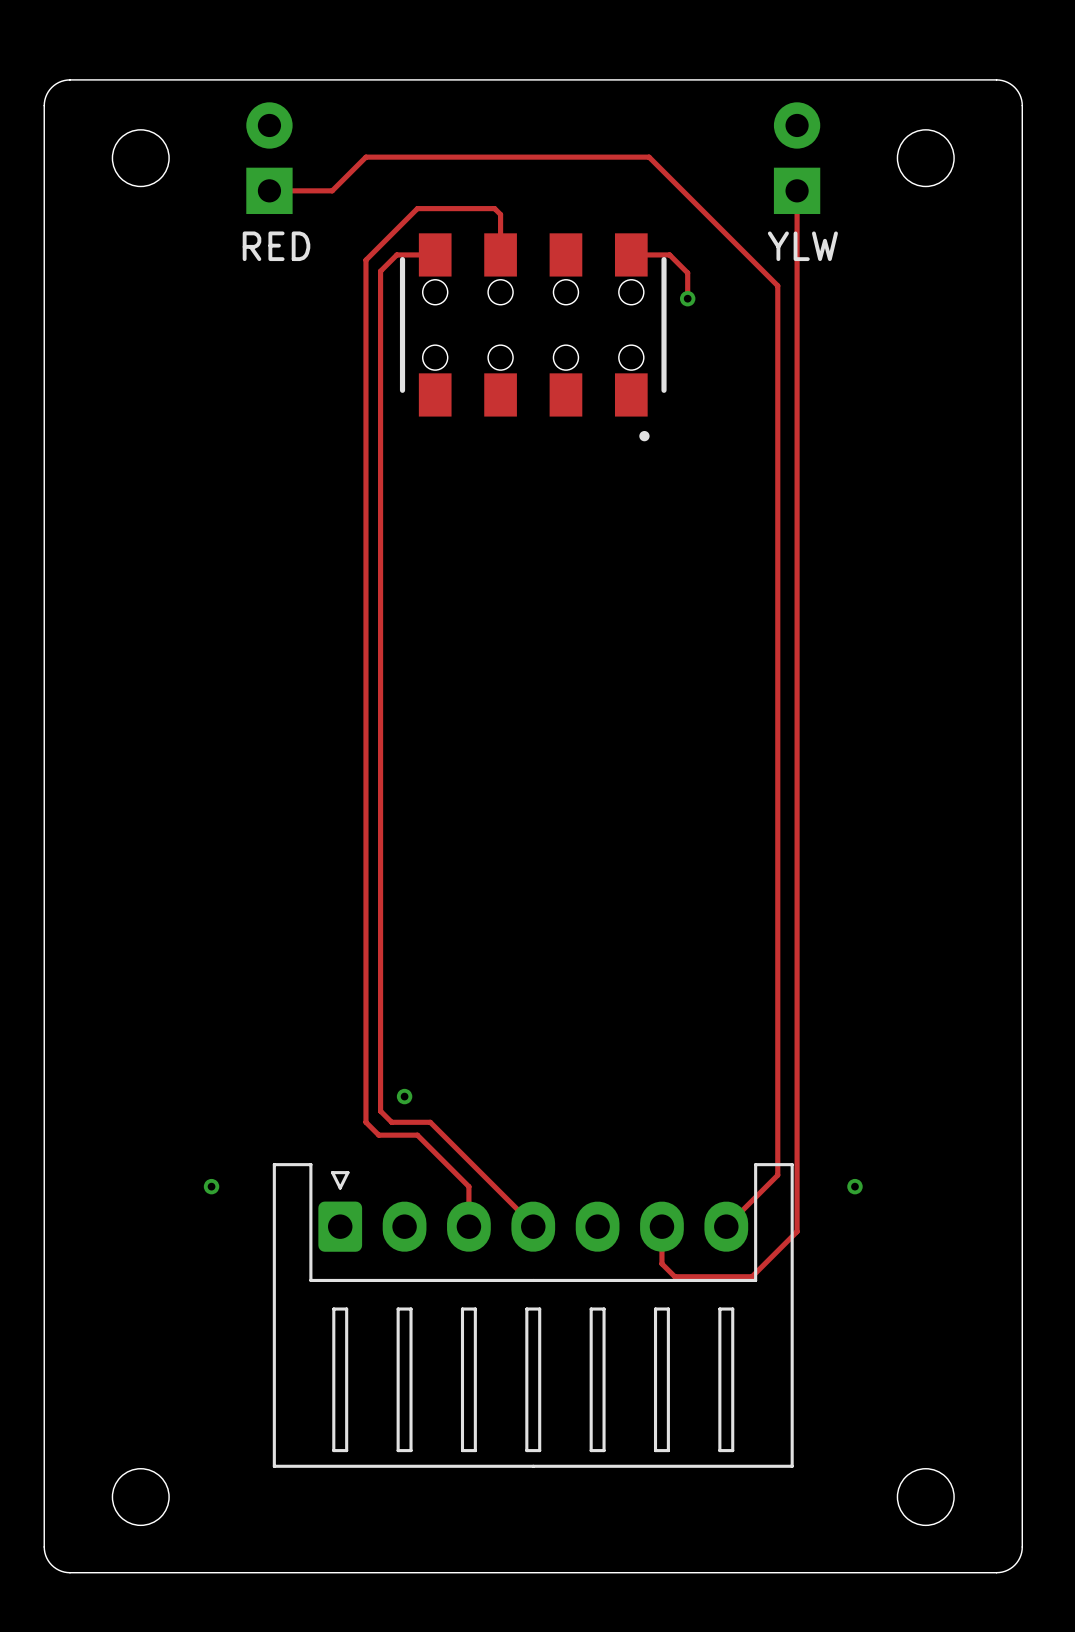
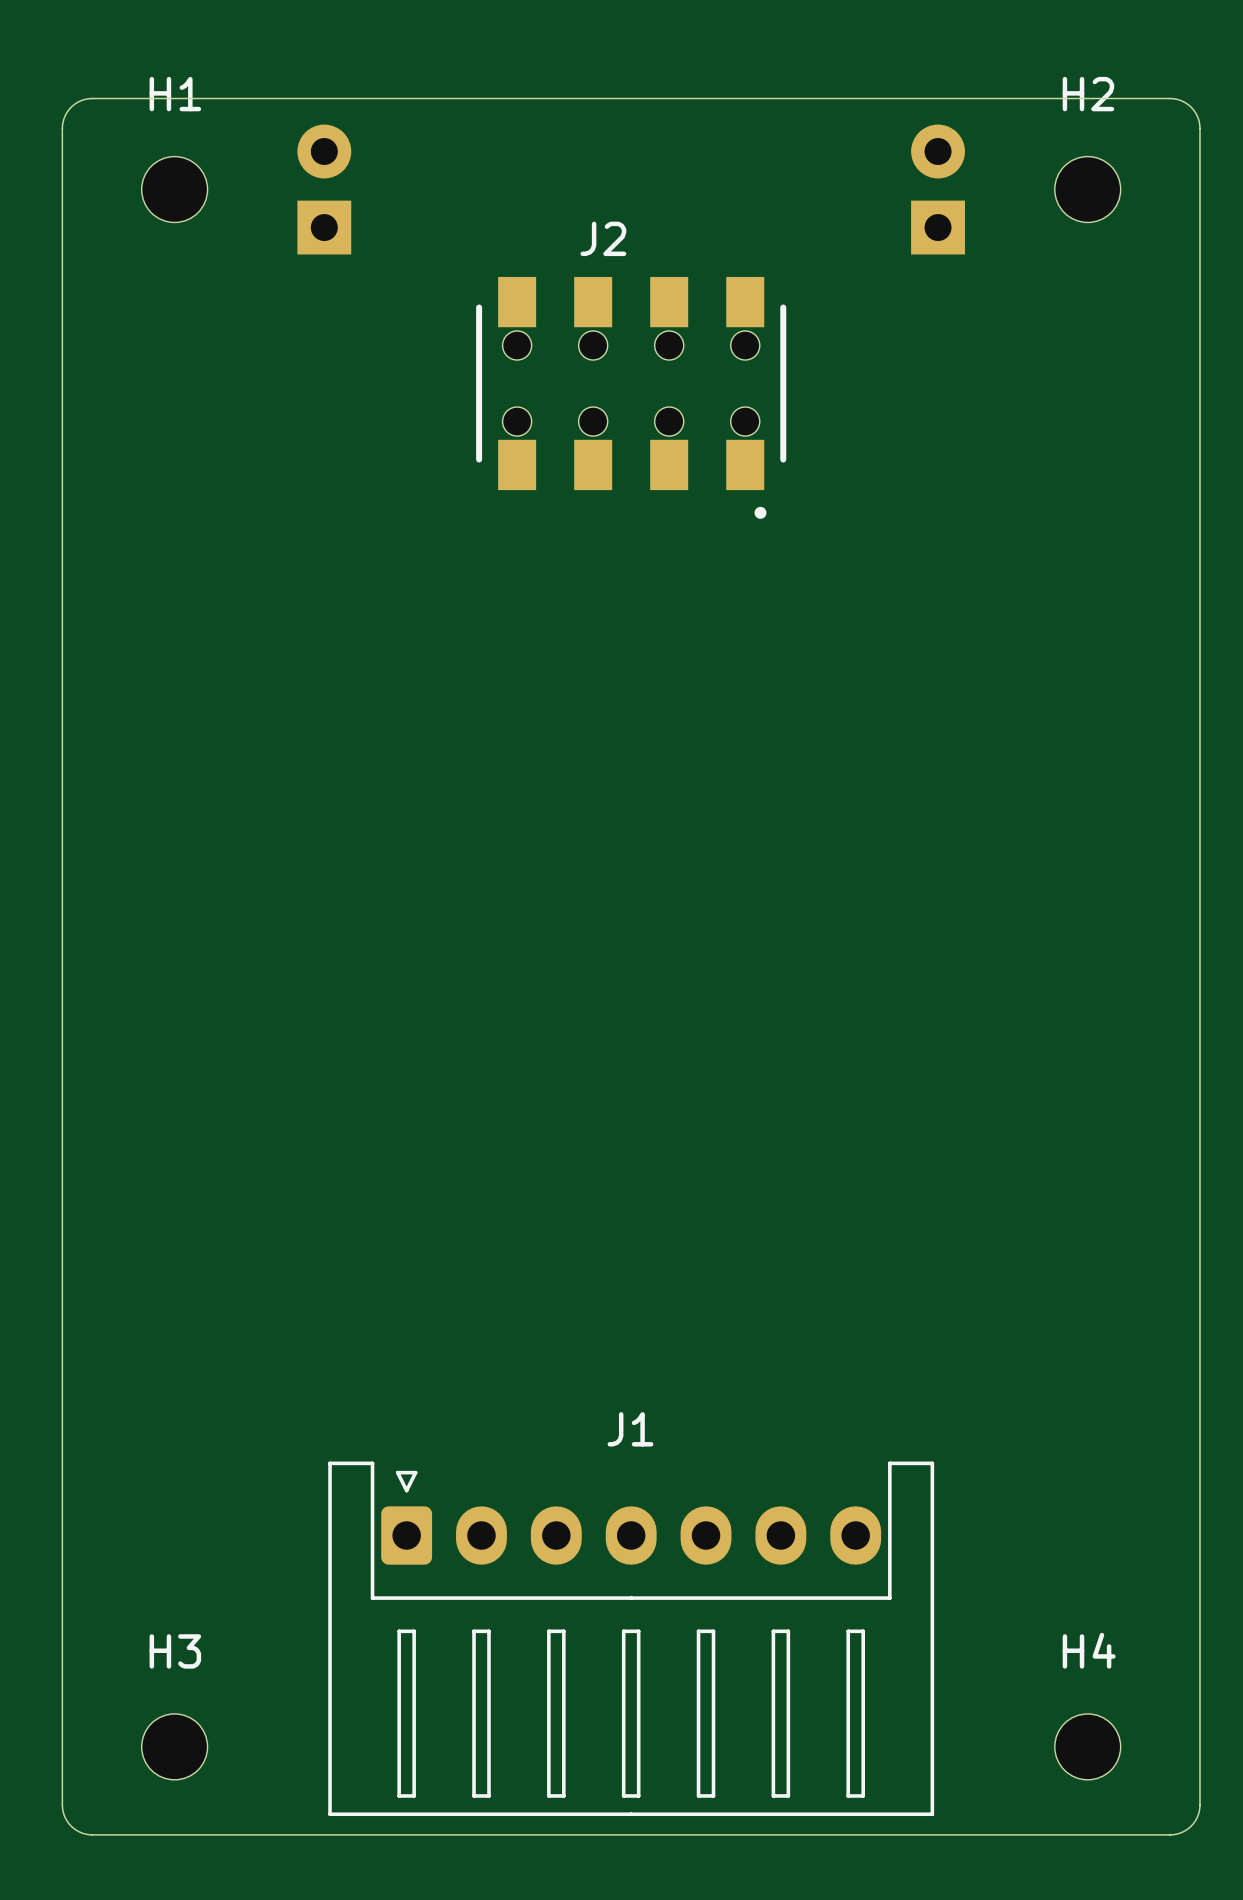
H1 name: none -> H1 (175, 94)
H2 name: none -> H2 (1088, 94)
track: (269, 190) (332, 190) (365, 157) (649, 157) (777, 285) (777, 1175) (726, 1226) -> none
track: (797, 194) (797, 1231) (752, 1276) (674, 1276) (661, 1263) (661, 1226) -> none
J2 name: none -> J2 (603, 238)
part value: RED (276, 246) -> none
part value: YLW (802, 246) -> none
track: (435, 254) (396, 254) (380, 271) (380, 1111) (391, 1122) (430, 1122) (533, 1226) -> none
track: (500, 254) (500, 214) (494, 208) (417, 208) (365, 260) (365, 1122) (378, 1135) (417, 1135) (468, 1186) (468, 1226) -> none
track: (631, 254) (669, 254) (687, 272) (687, 298) -> none
via: (687, 298) -> none
via: (404, 1096) -> none
via: (211, 1186) -> none
via: (854, 1186) -> none
part: (533, 1315) -> none
J1: none -> (631, 1638)
H4 name: none -> H4 (1089, 1650)
H3 name: none -> H3 (175, 1651)

